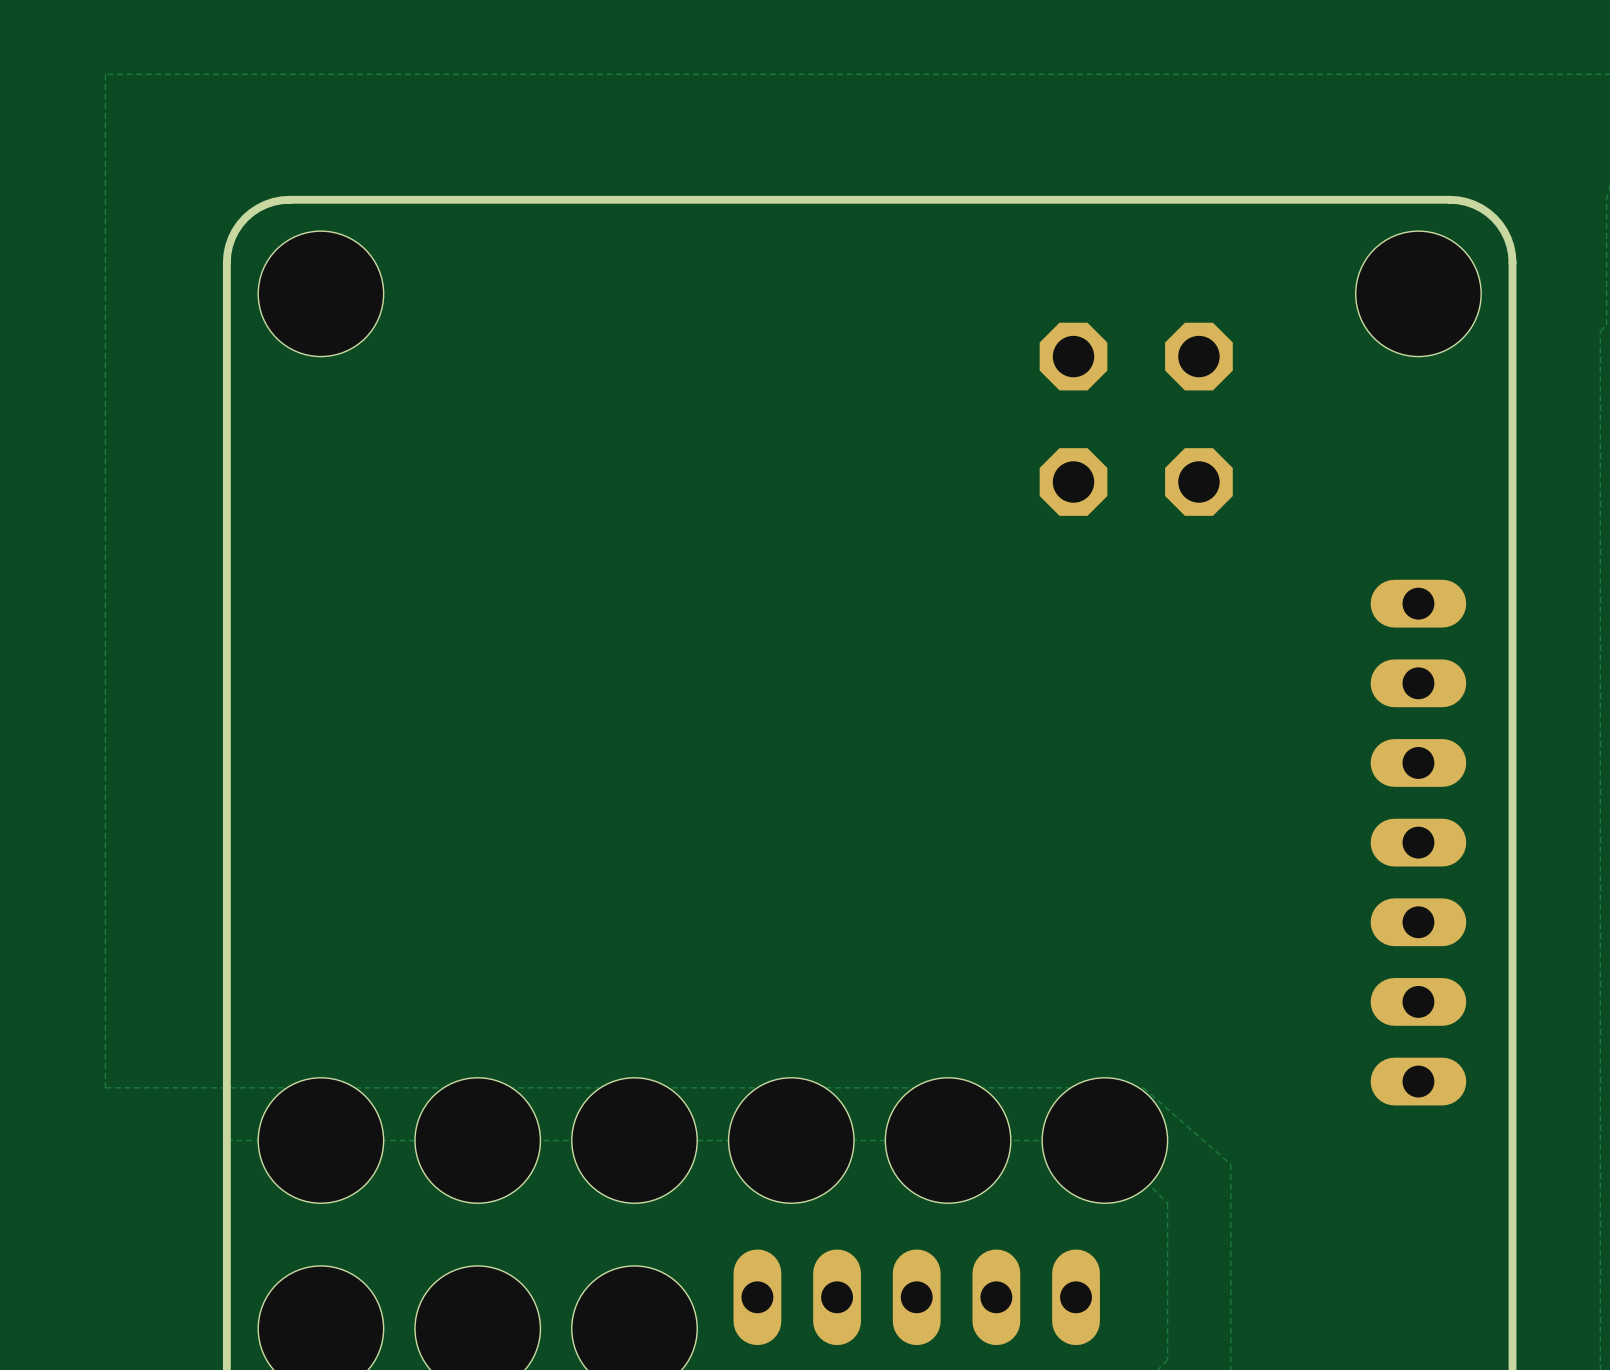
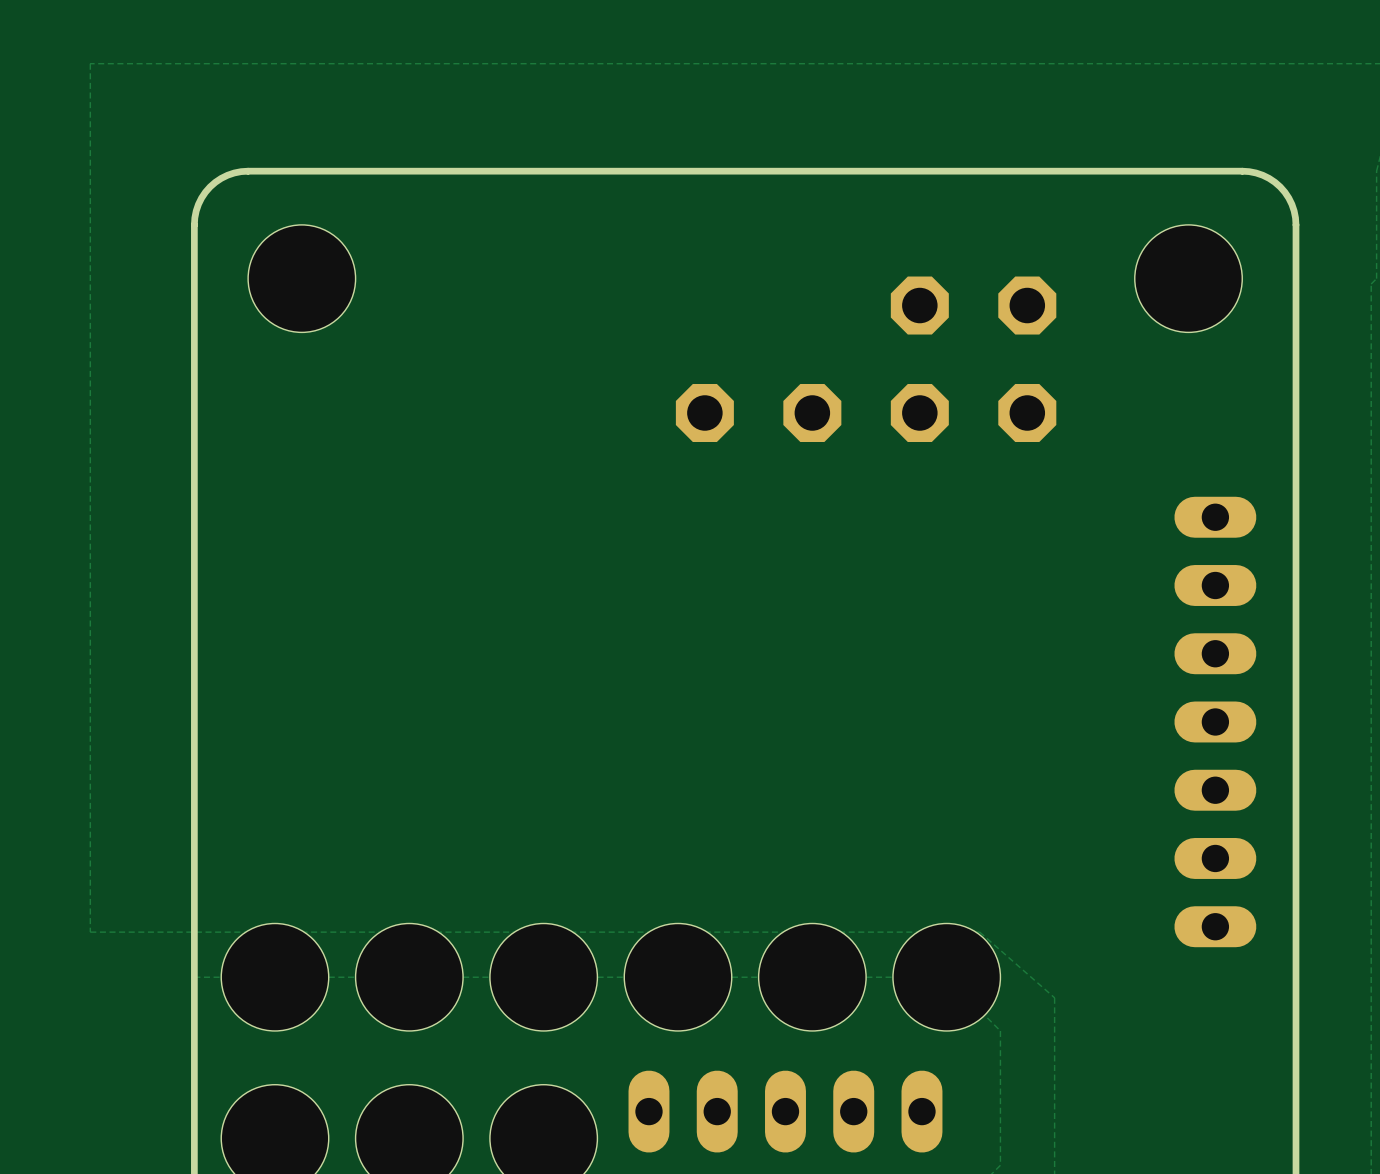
hole position: (320, 293) -> (301, 278)
hole position: (1418, 293) -> (1188, 278)
part: none -> (704, 412)
part: none -> (812, 412)

